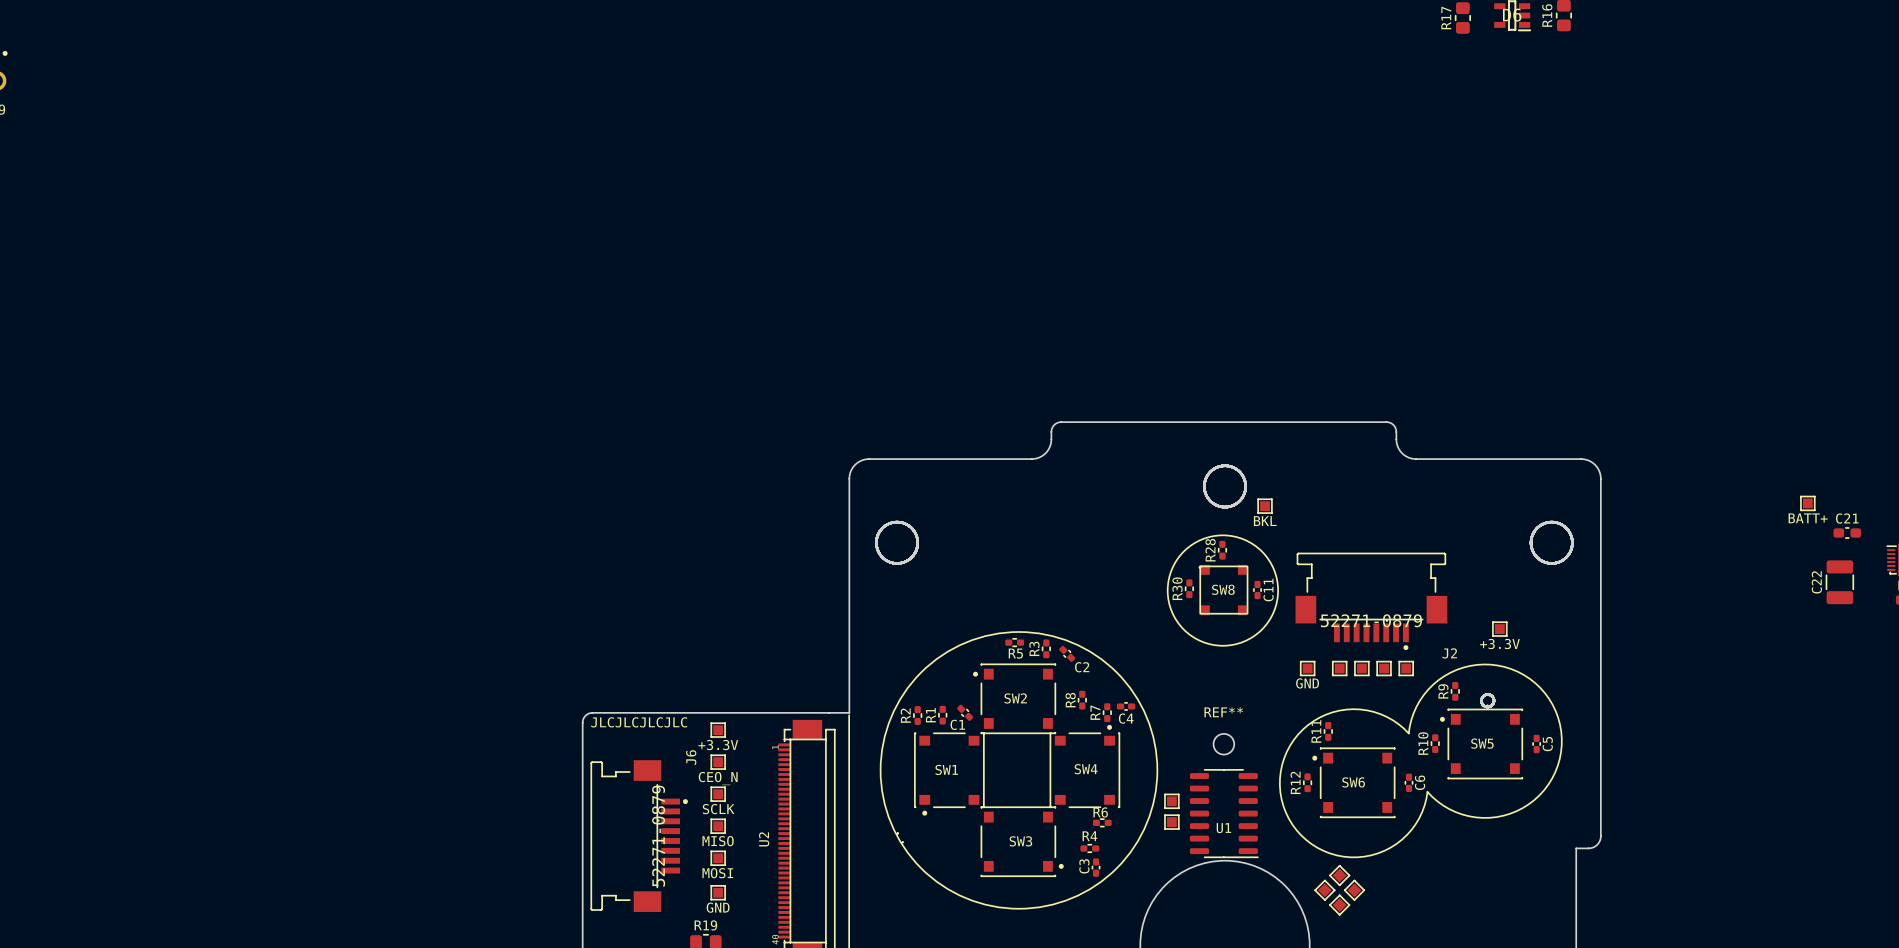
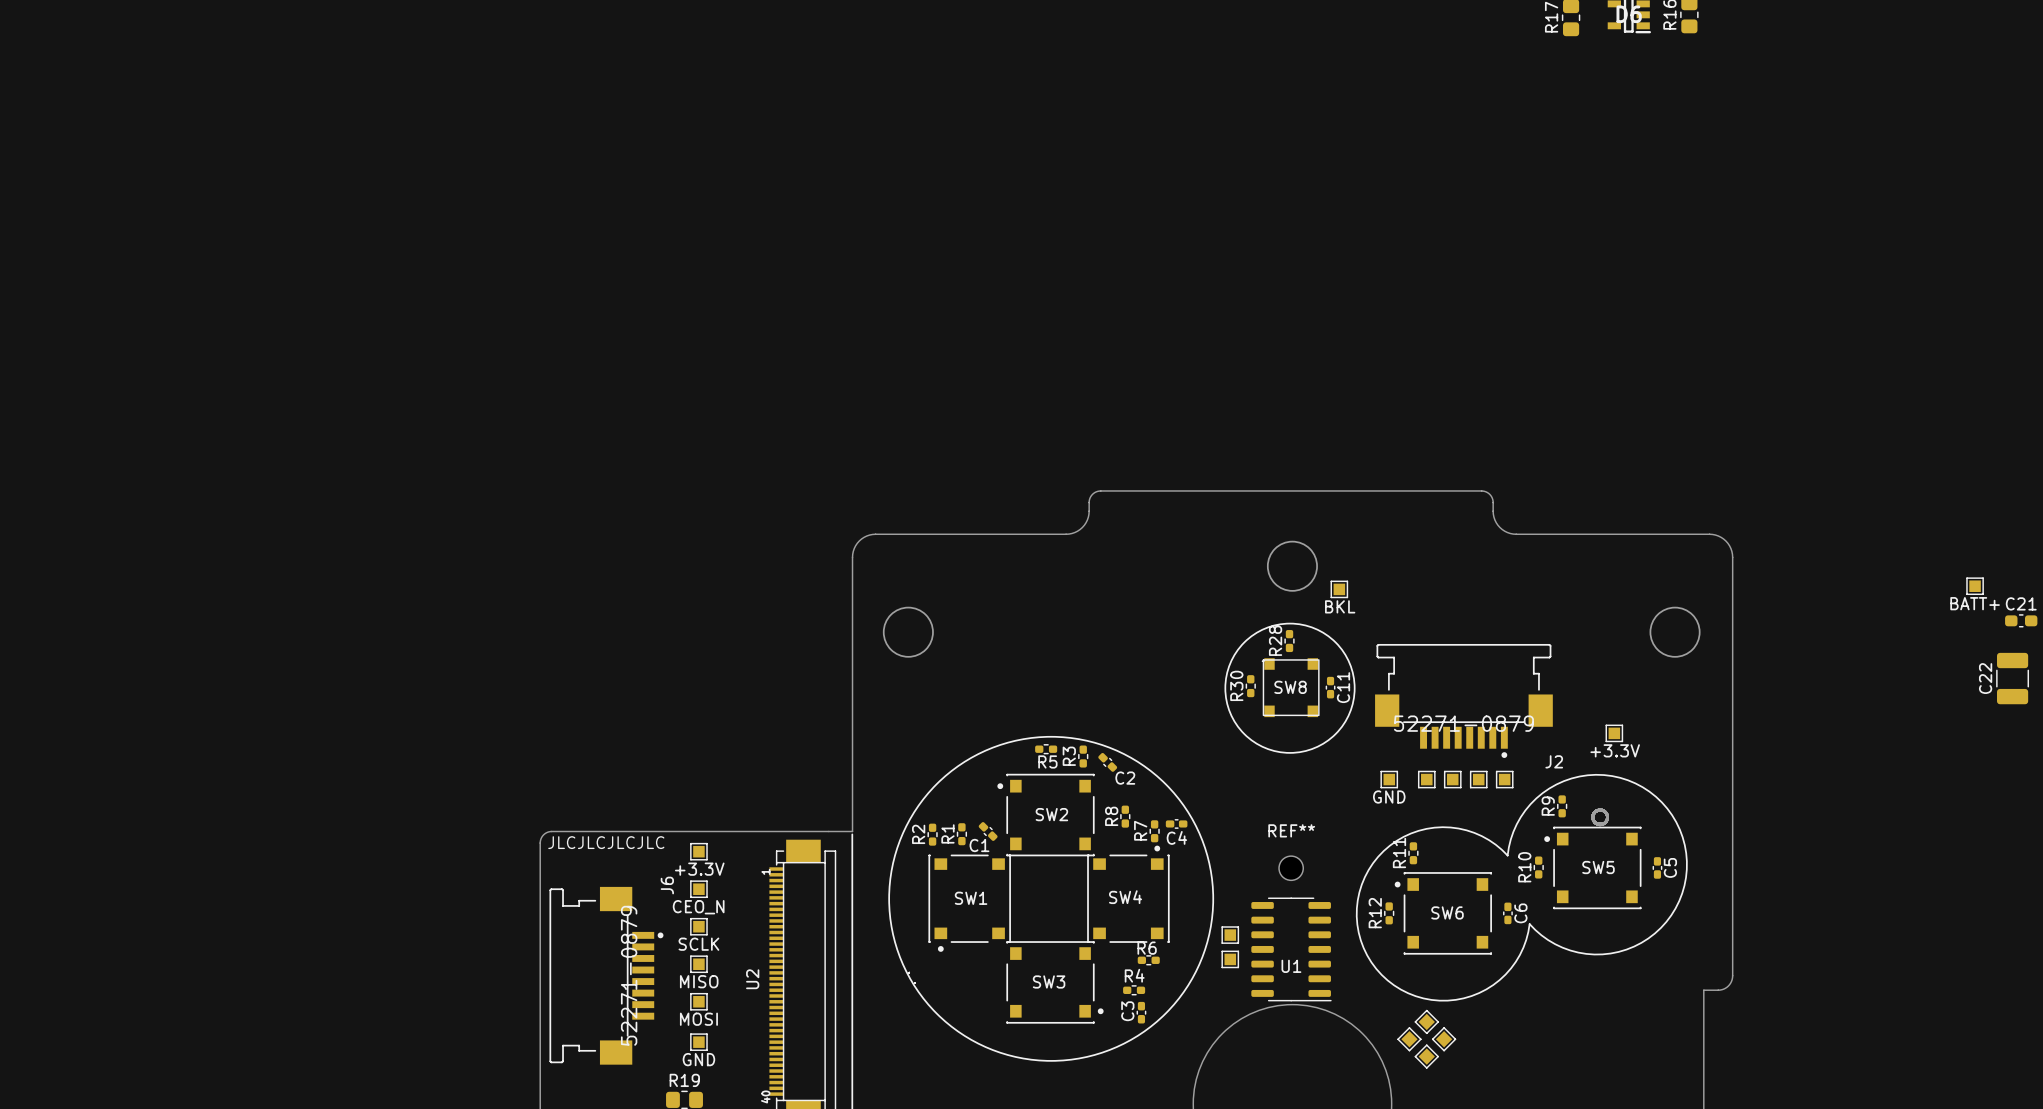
round board edge: none -> [1266, 540, 1318, 592]
board edge: (1224, 465) (1217, 467) (1209, 472) (1205, 478) (1204, 487) (1205, 494) (1210, 501) (1217, 505) (1225, 507) (1232, 505) (1240, 500) (1244, 494) (1245, 485) (1244, 478) (1239, 471) (1232, 467) (1224, 465) -> none
round board edge: none -> [882, 606, 934, 658]
round board edge: none -> [1649, 606, 1701, 658]
board edge: (895, 522) (902, 522) (910, 526) (915, 533) (917, 540) (916, 548) (912, 556) (906, 561) (898, 563) (891, 562) (883, 558) (878, 551) (876, 544) (877, 537) (881, 529) (888, 524) (895, 522) -> none
board edge: (1549, 522) (1557, 522) (1564, 526) (1570, 533) (1572, 540) (1571, 548) (1567, 556) (1560, 561) (1553, 563) (1546, 562) (1538, 558) (1533, 551) (1531, 544) (1531, 537) (1535, 529) (1542, 524) (1549, 522) -> none

